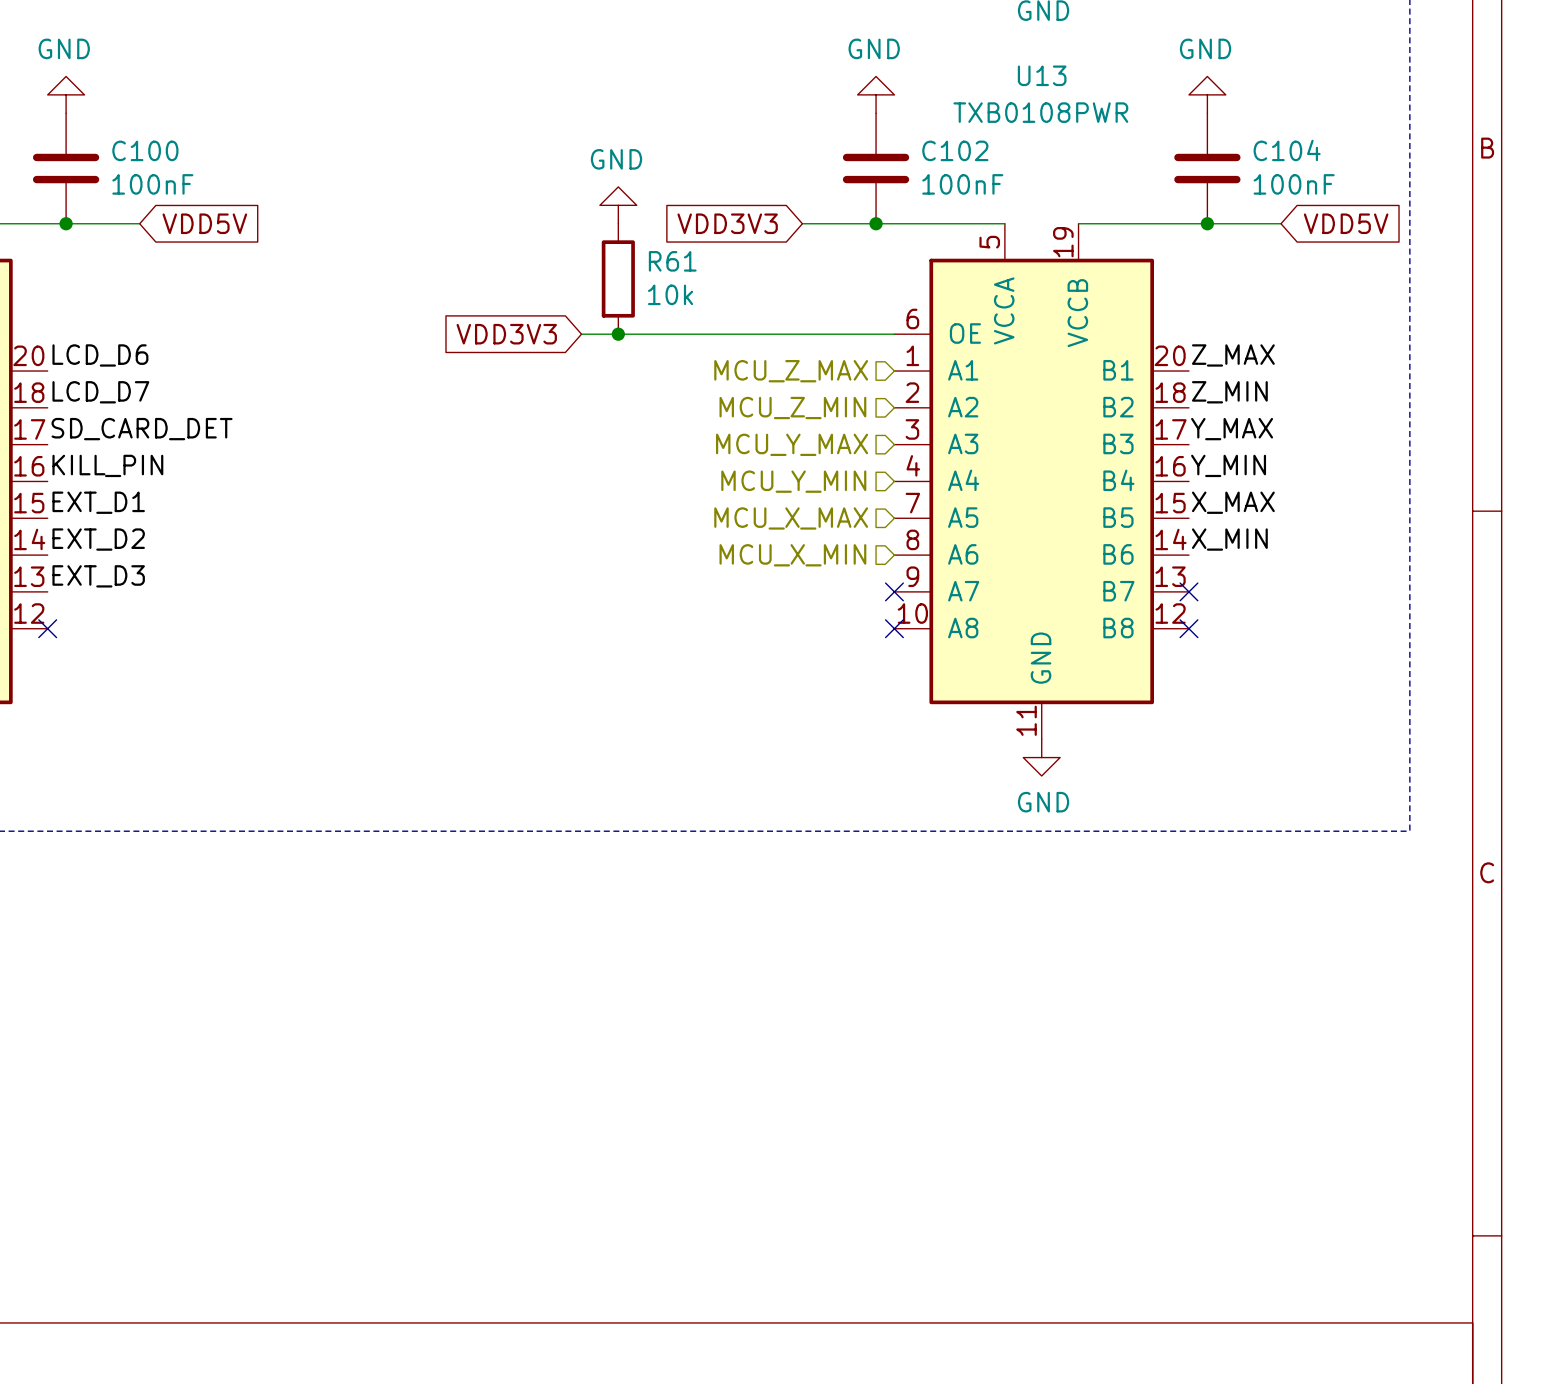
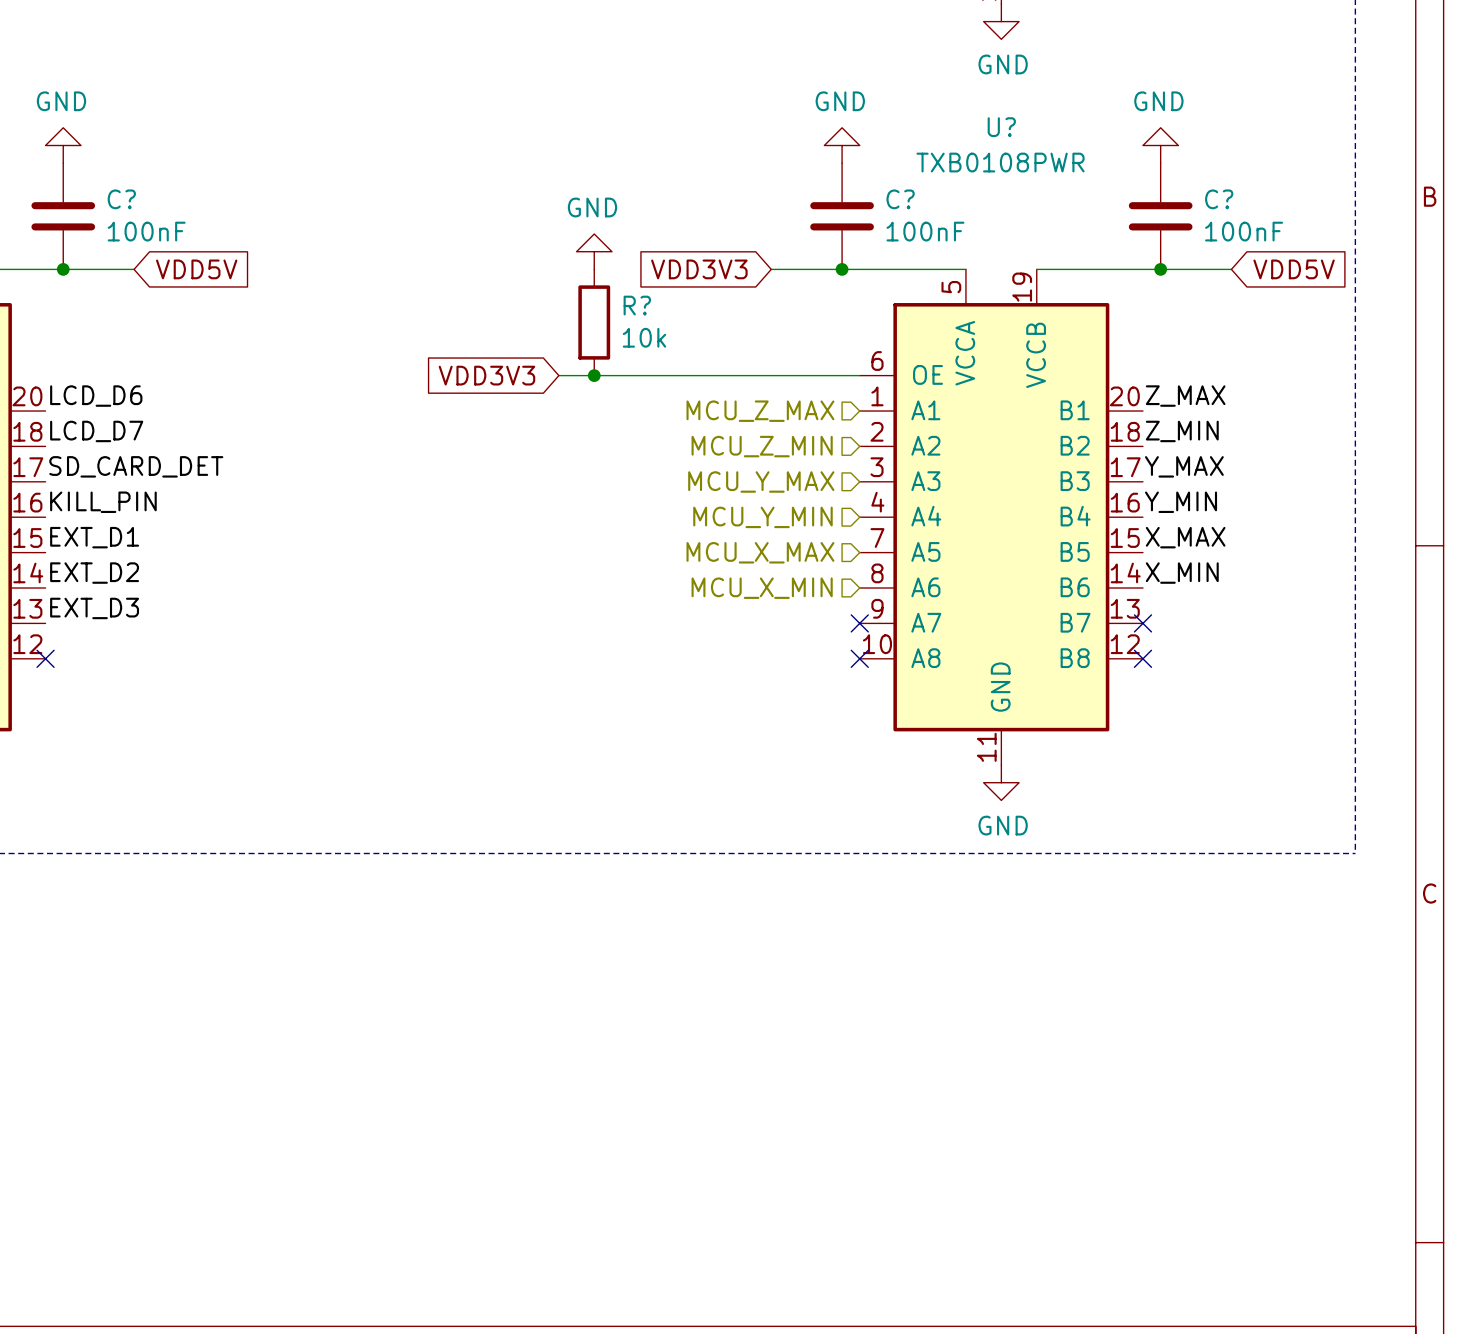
U13 name: U13 (1042, 75) -> U? (1001, 127)
C100 name: C100 (145, 150) -> C? (121, 199)
C102 name: C102 (955, 150) -> C? (900, 199)
C104 name: C104 (1287, 150) -> C? (1219, 199)
R61 name: R61 (672, 261) -> R? (637, 305)

